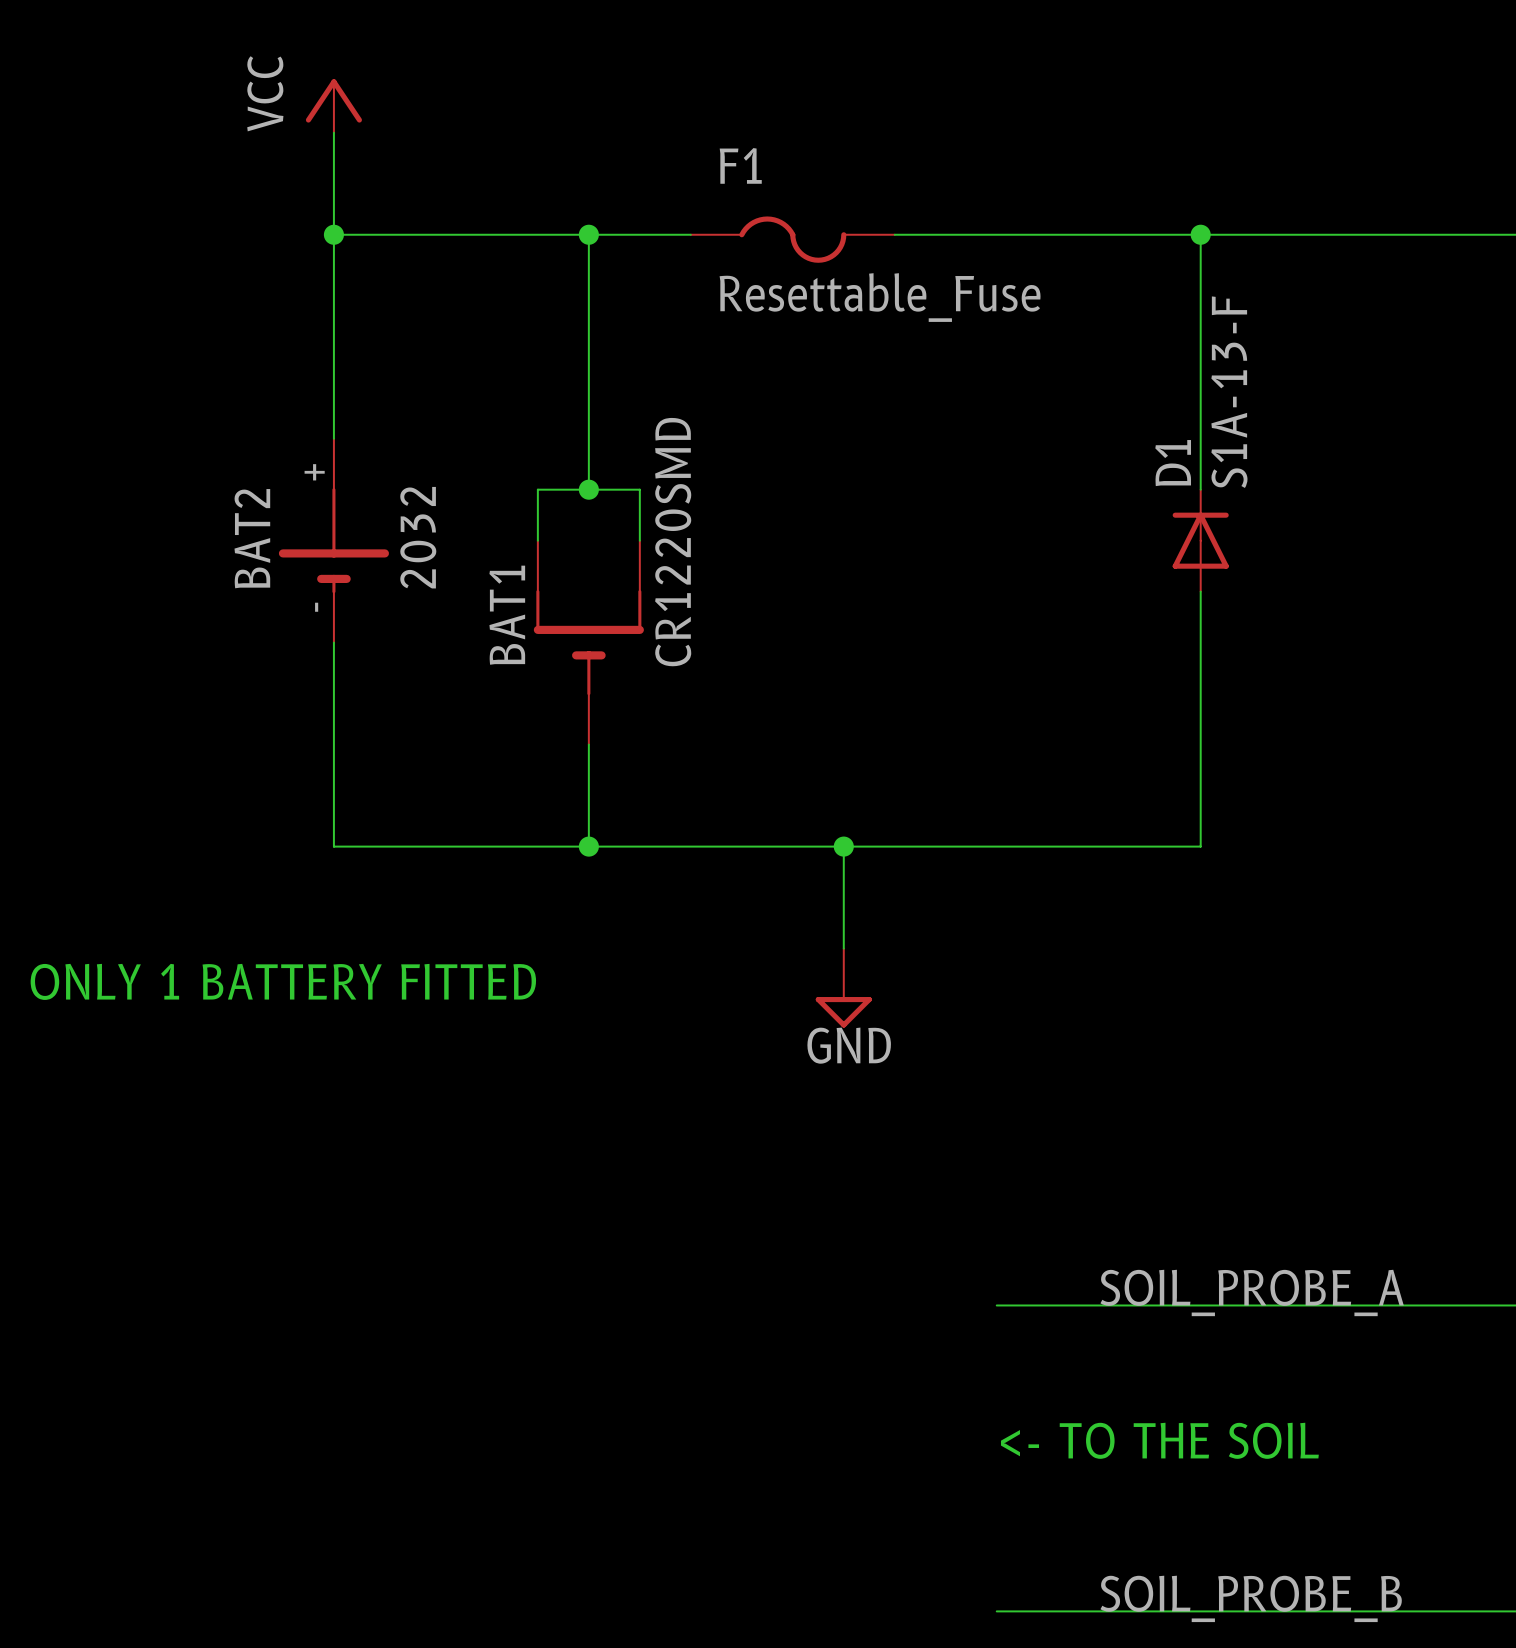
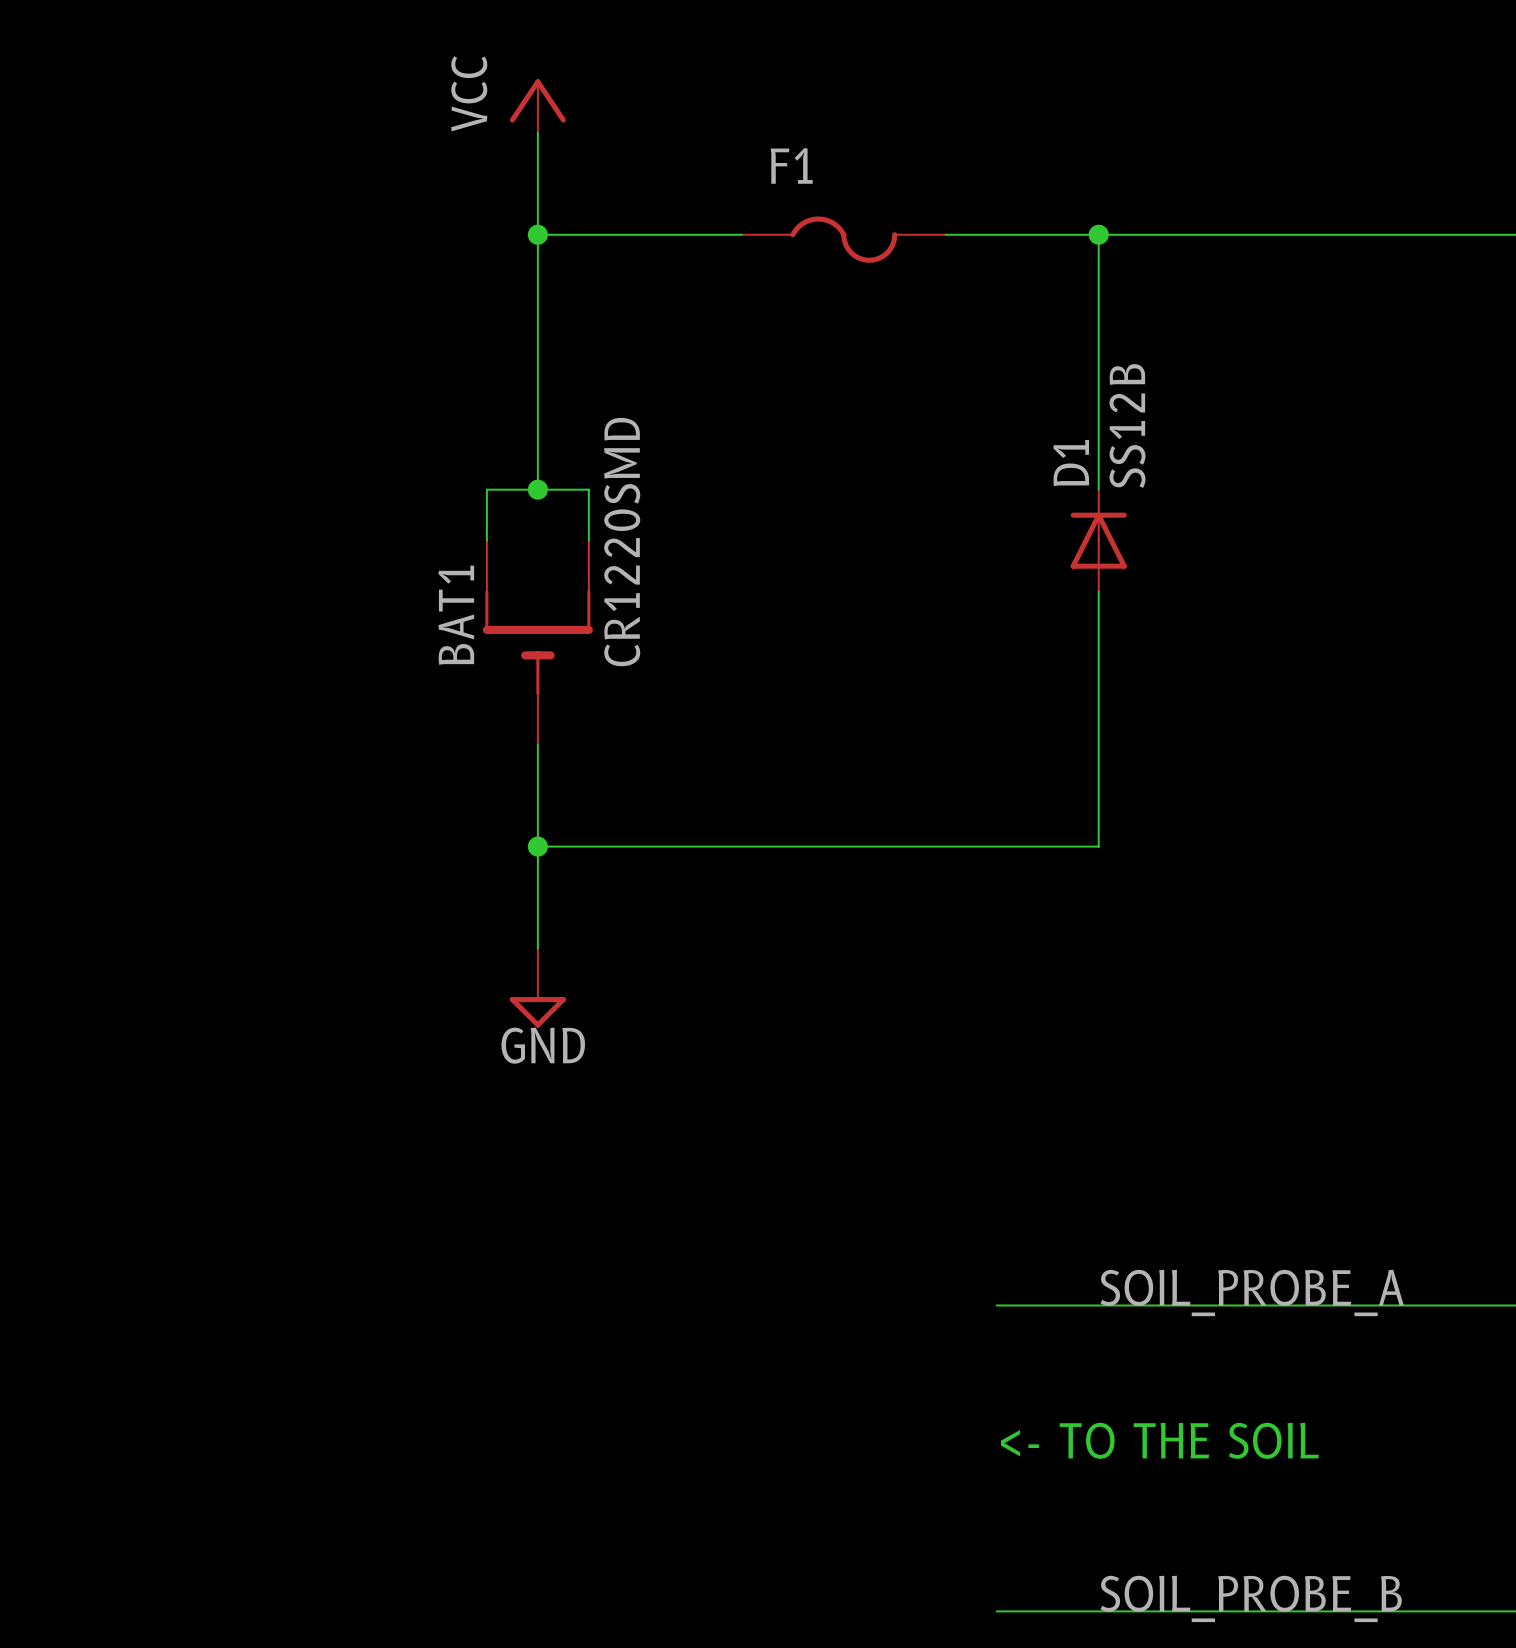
power symbol position: VCC (333, 106) -> VCC (537, 106)
wire: (333, 132) (333, 438) -> none
wire: none -> (537, 132) (537, 489) (486, 489) (486, 540)
wire: (333, 234) (537, 234) -> none
junction: (333, 234) -> none
wire: (588, 234) (588, 489) (639, 489) (639, 540) -> none
junction position: (588, 234) -> (537, 234)
wire: (1200, 234) (1200, 489) -> (1098, 234) (1098, 489)
junction position: (1200, 234) -> (1098, 234)
F1 position: (792, 239) -> (843, 239)
F1 value: Resettable_Fuse (880, 297) -> none
D1 value: S1A-13-F (1229, 392) -> SS12B (1127, 426)
wire: (537, 489) (537, 540) -> (588, 489) (588, 540)
junction position: (588, 489) -> (537, 489)
BAT2: 2032 (333, 540) -> none
D1 position: (1200, 540) -> (1098, 540)
wire: (1200, 591) (1200, 846) (1098, 846) -> (1098, 591) (1098, 846)
wire: (333, 642) (333, 846) (537, 846) -> none
BAT1 position: (588, 642) -> (537, 642)
wire: none -> (537, 744) (537, 948)
wire: (588, 744) (588, 846) -> none
junction position: (588, 846) -> (537, 846)
wire: (843, 846) (843, 948) -> none
junction: (843, 846) -> none
text: ONLY 1 BATTERY FITTED (283, 981) -> none
power symbol position: GND (843, 988) -> GND (537, 988)

